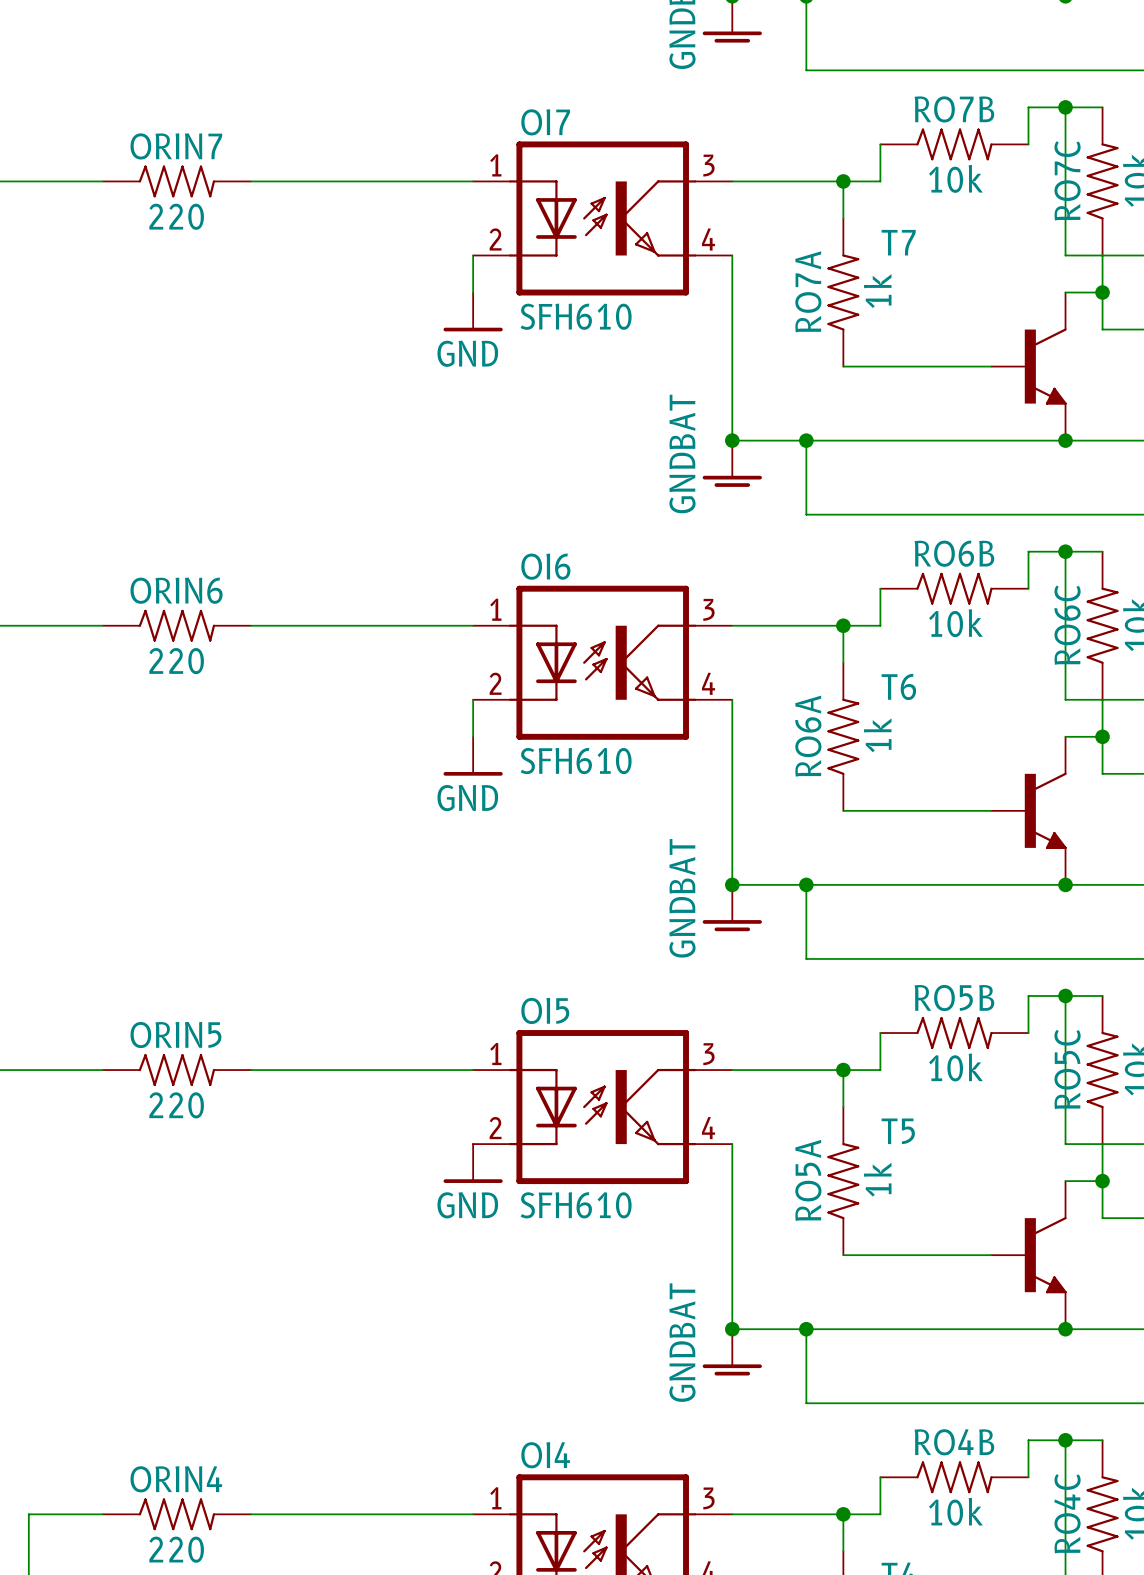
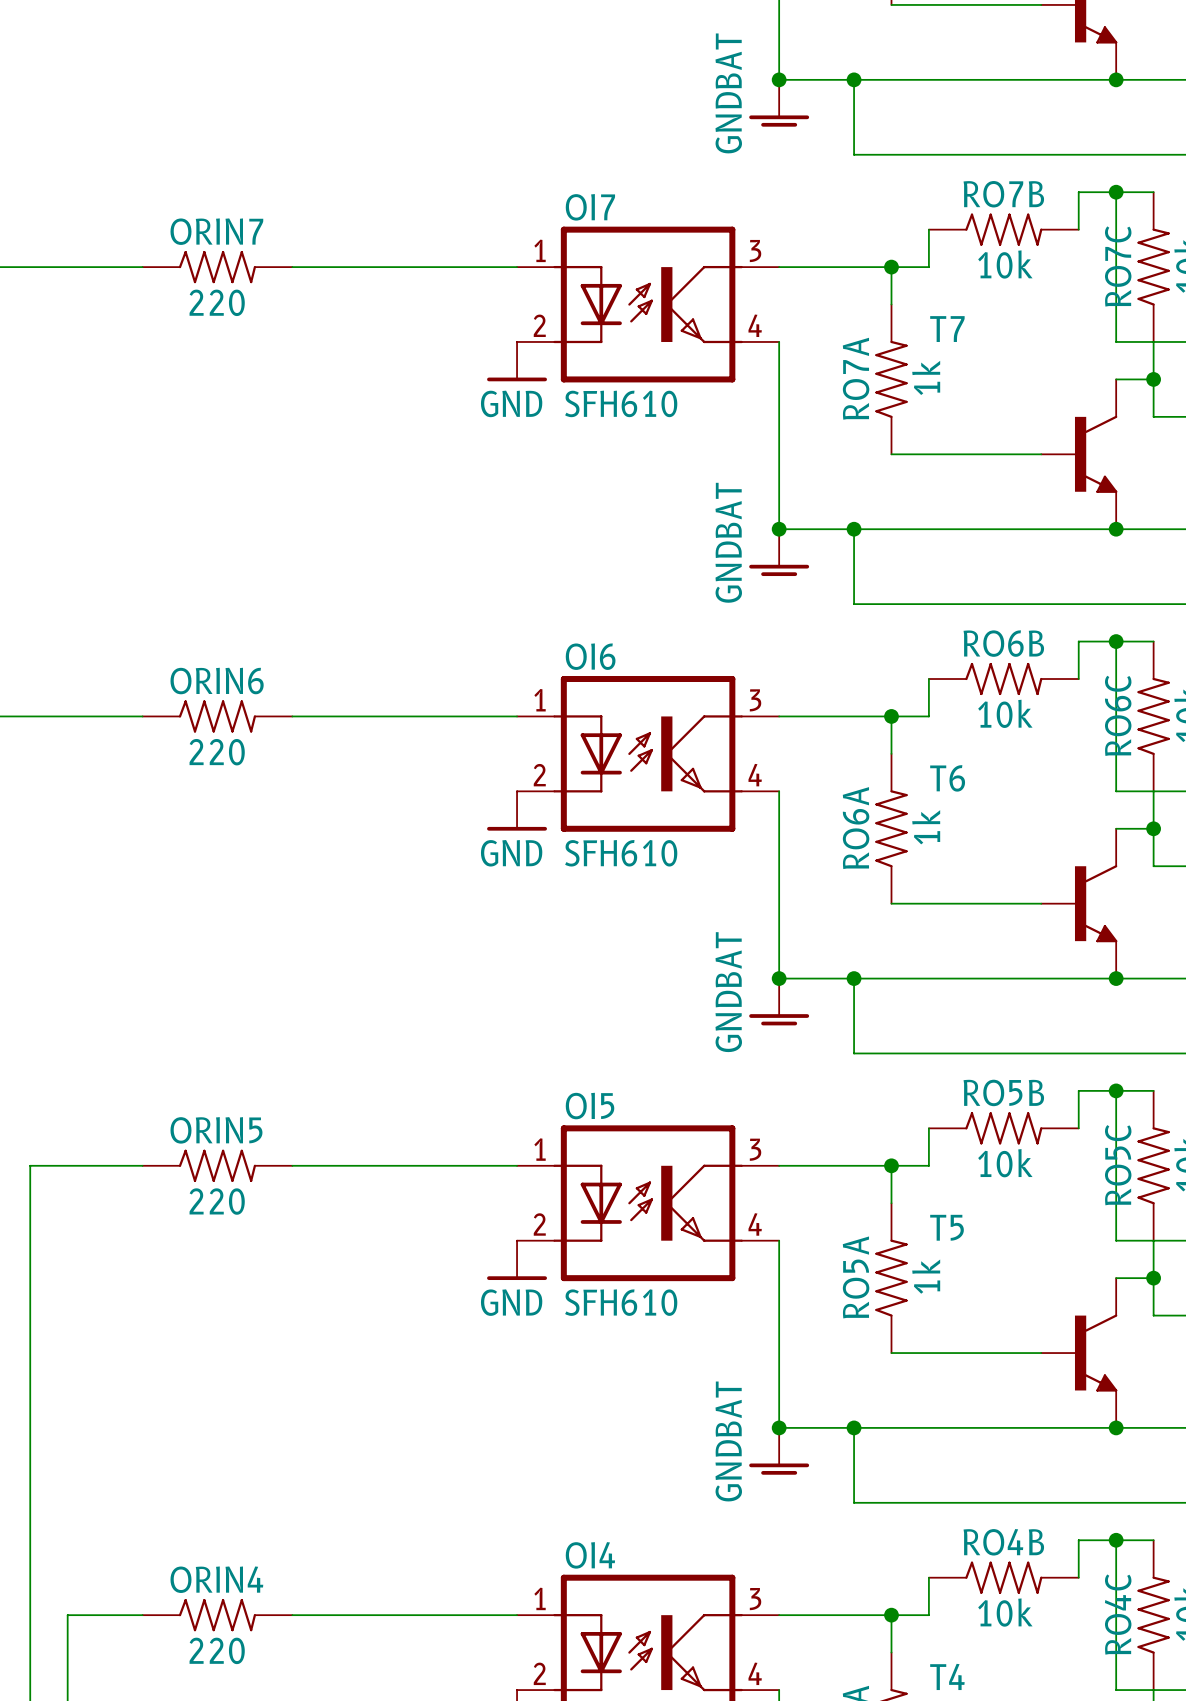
power symbol position: GND (473, 311) -> GND (517, 361)
power symbol position: GND (473, 756) -> GND (517, 811)

